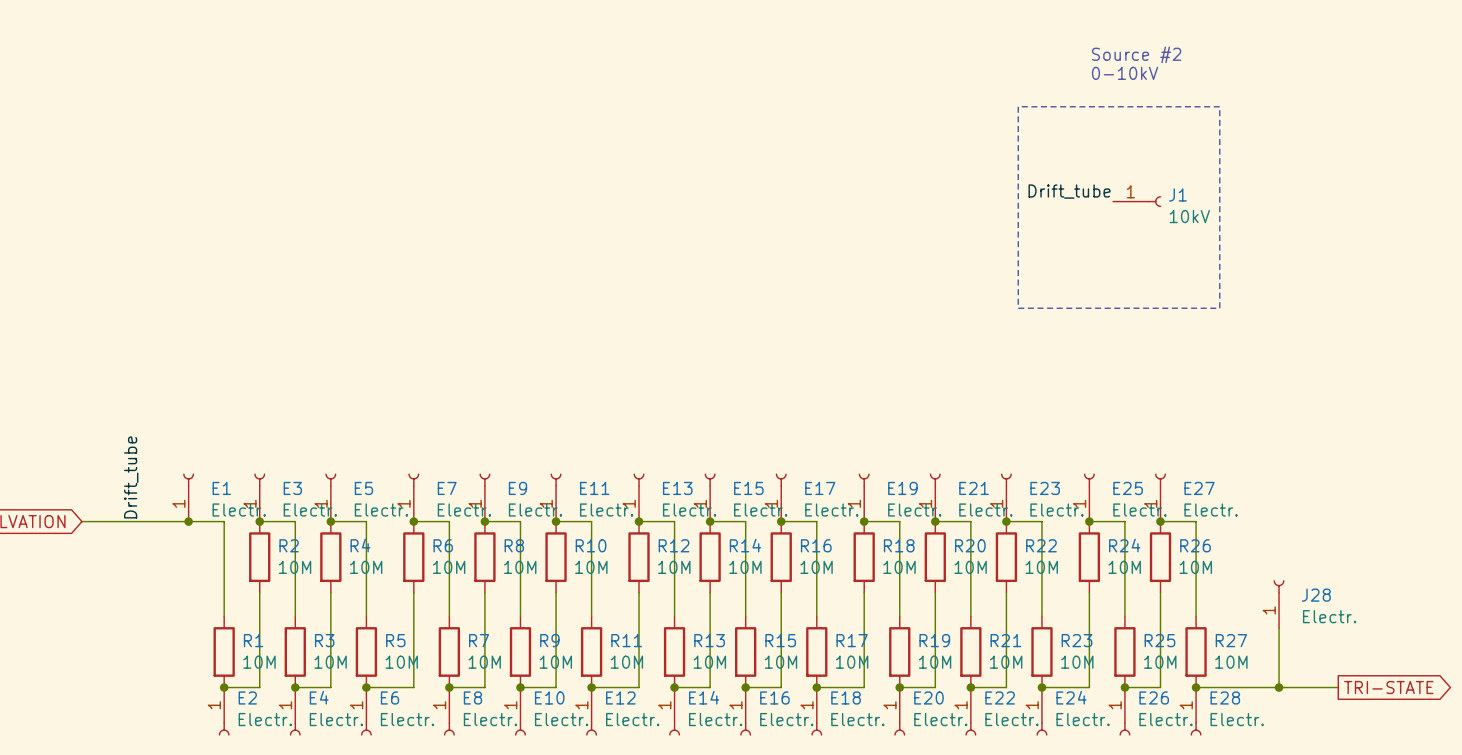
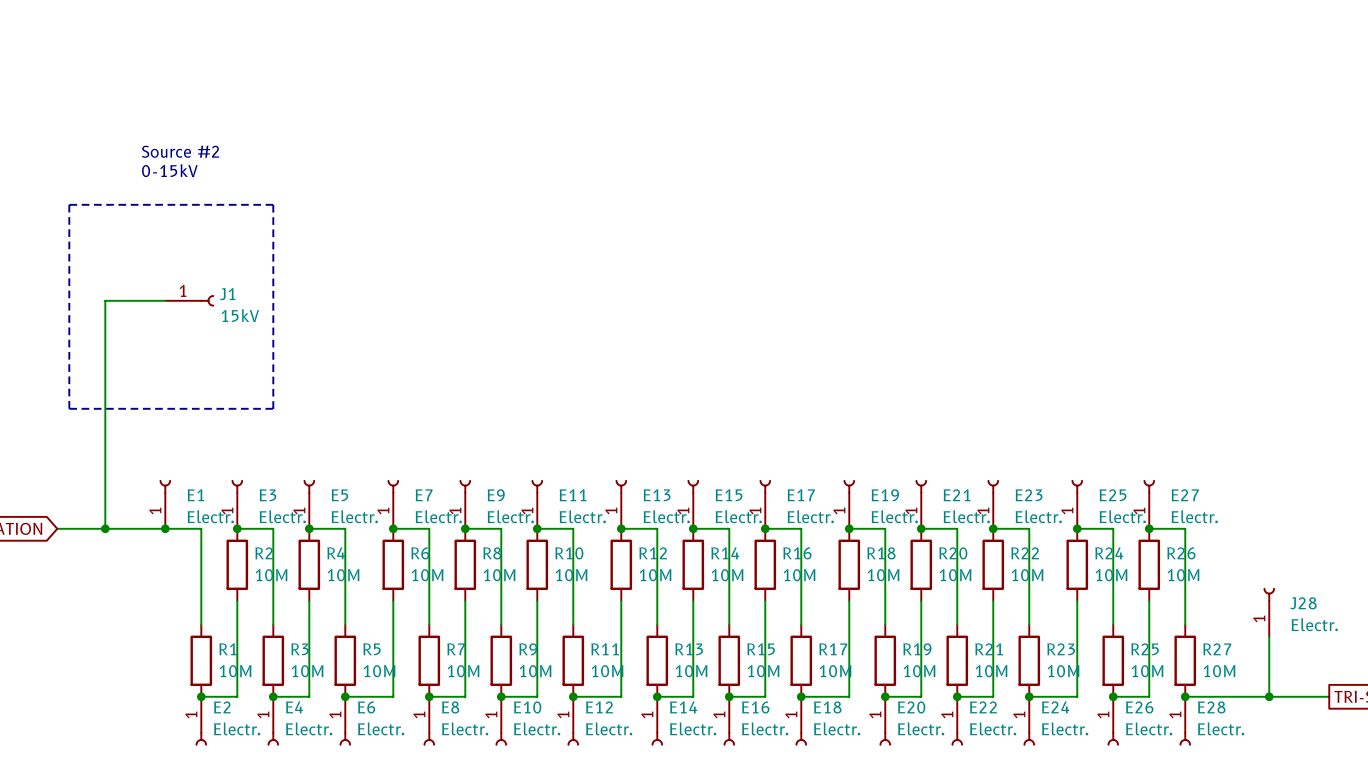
text: Source #2 (1136, 54) -> none
text: 0-10kV (1125, 73) -> none
line: (1018, 106) (1219, 106) (1219, 308) (1018, 308) (1018, 106) -> none
text: none -> Source #2 (180, 151)
text: none -> 0-15kV (169, 170)
label: Drift_tube (1069, 191) -> none
line: none -> (69, 204) (273, 204) (273, 408) (69, 408) (69, 204)
J1 position: (1137, 201) -> (189, 300)
J1 value: 10kV (1189, 216) -> 15kV (240, 315)
wire: none -> (165, 300) (105, 300) (105, 528)
label: Drift_tube (131, 477) -> none
junction: none -> (105, 528)

